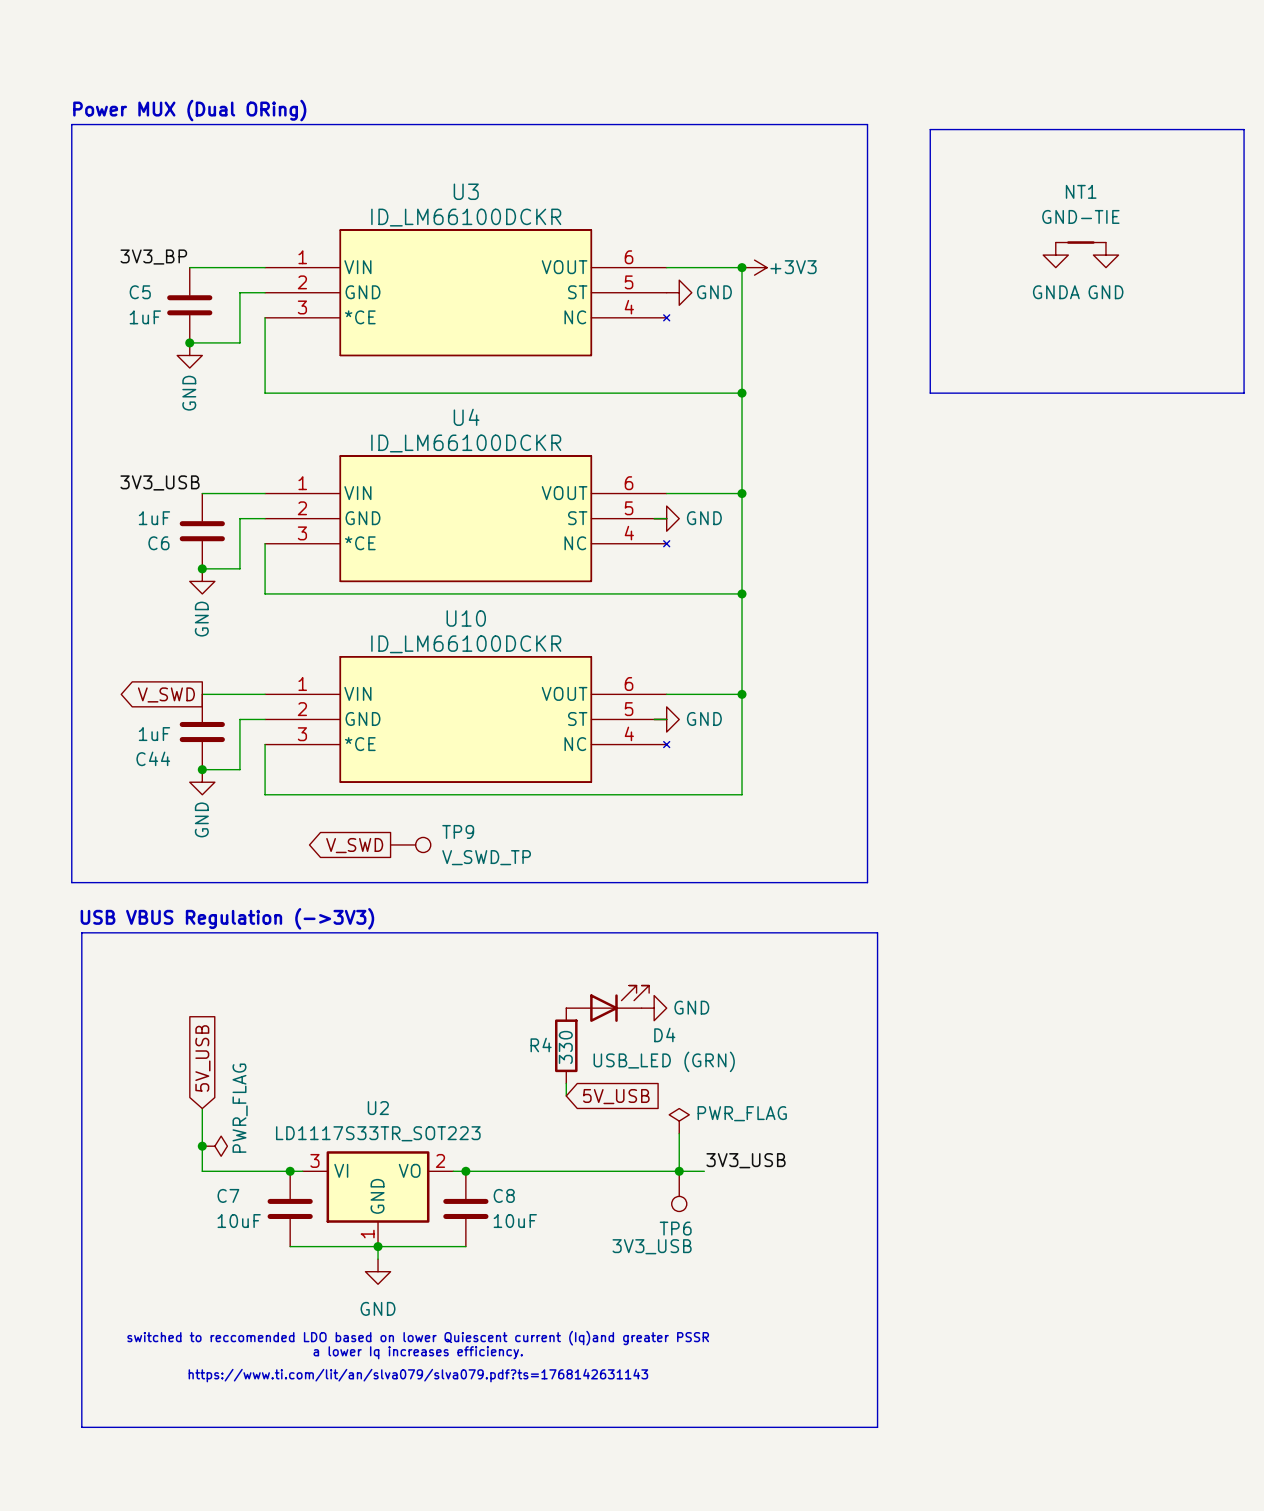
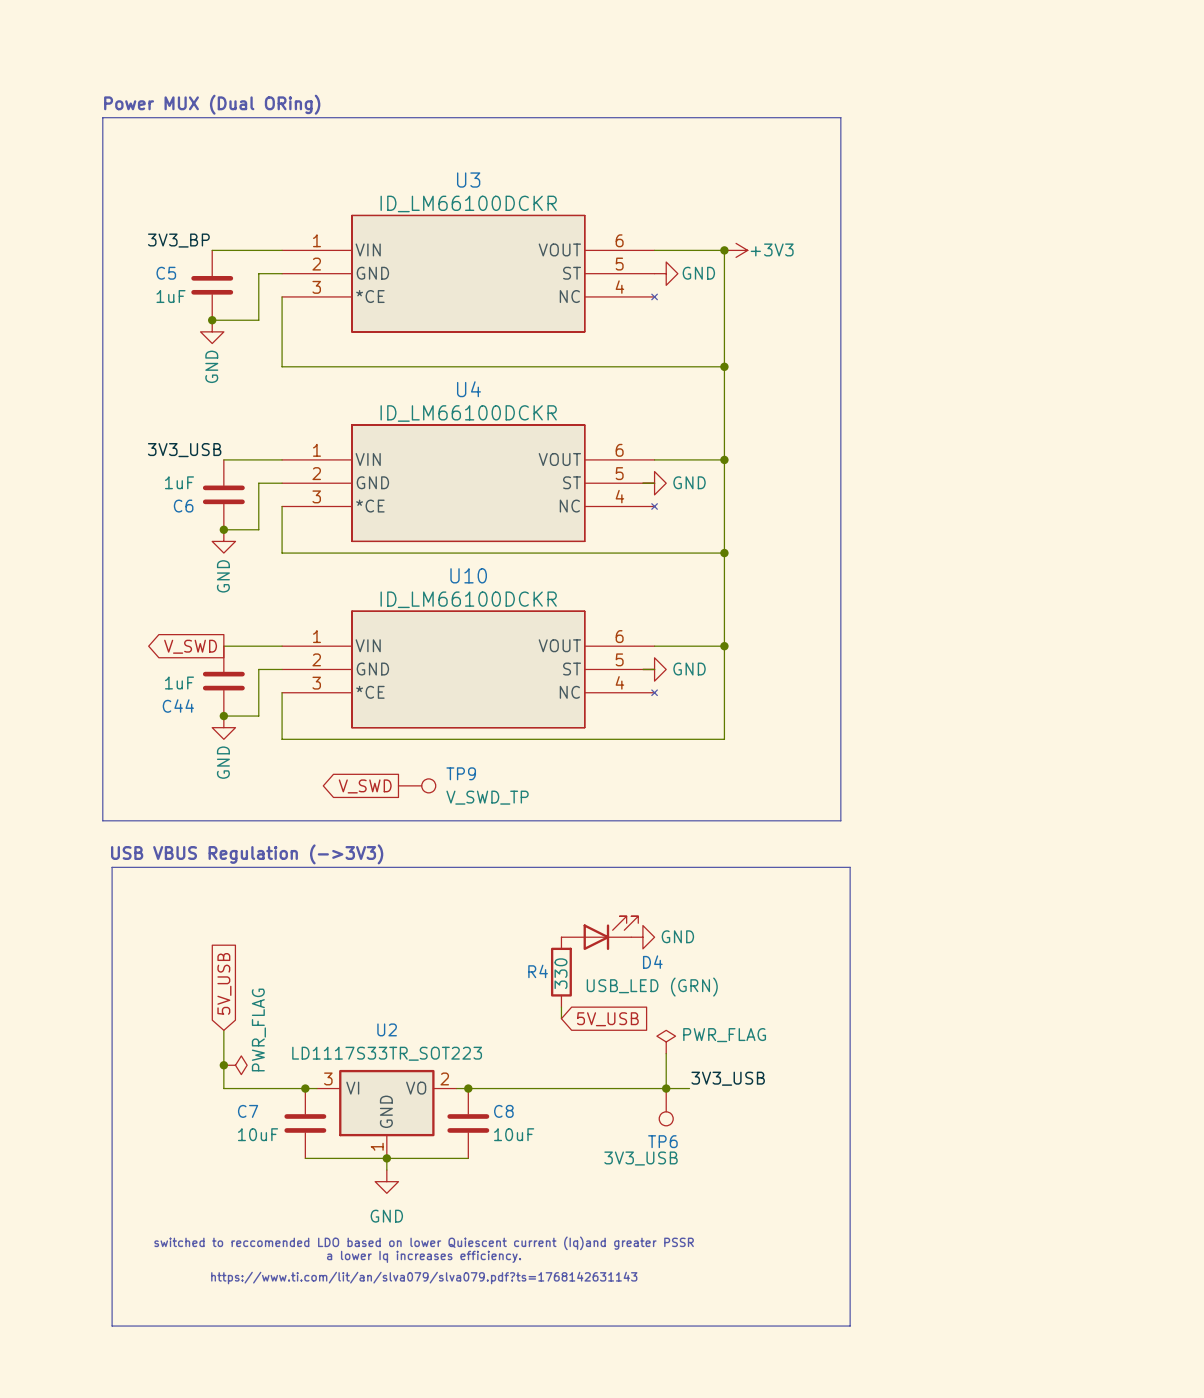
line: (930, 129) (1244, 129) (1244, 393) (930, 393) (930, 129) -> none
NT1: GND-TIE (1080, 242) -> none
power symbol: GNDA (1055, 255) -> none
power symbol: GND (1105, 255) -> none

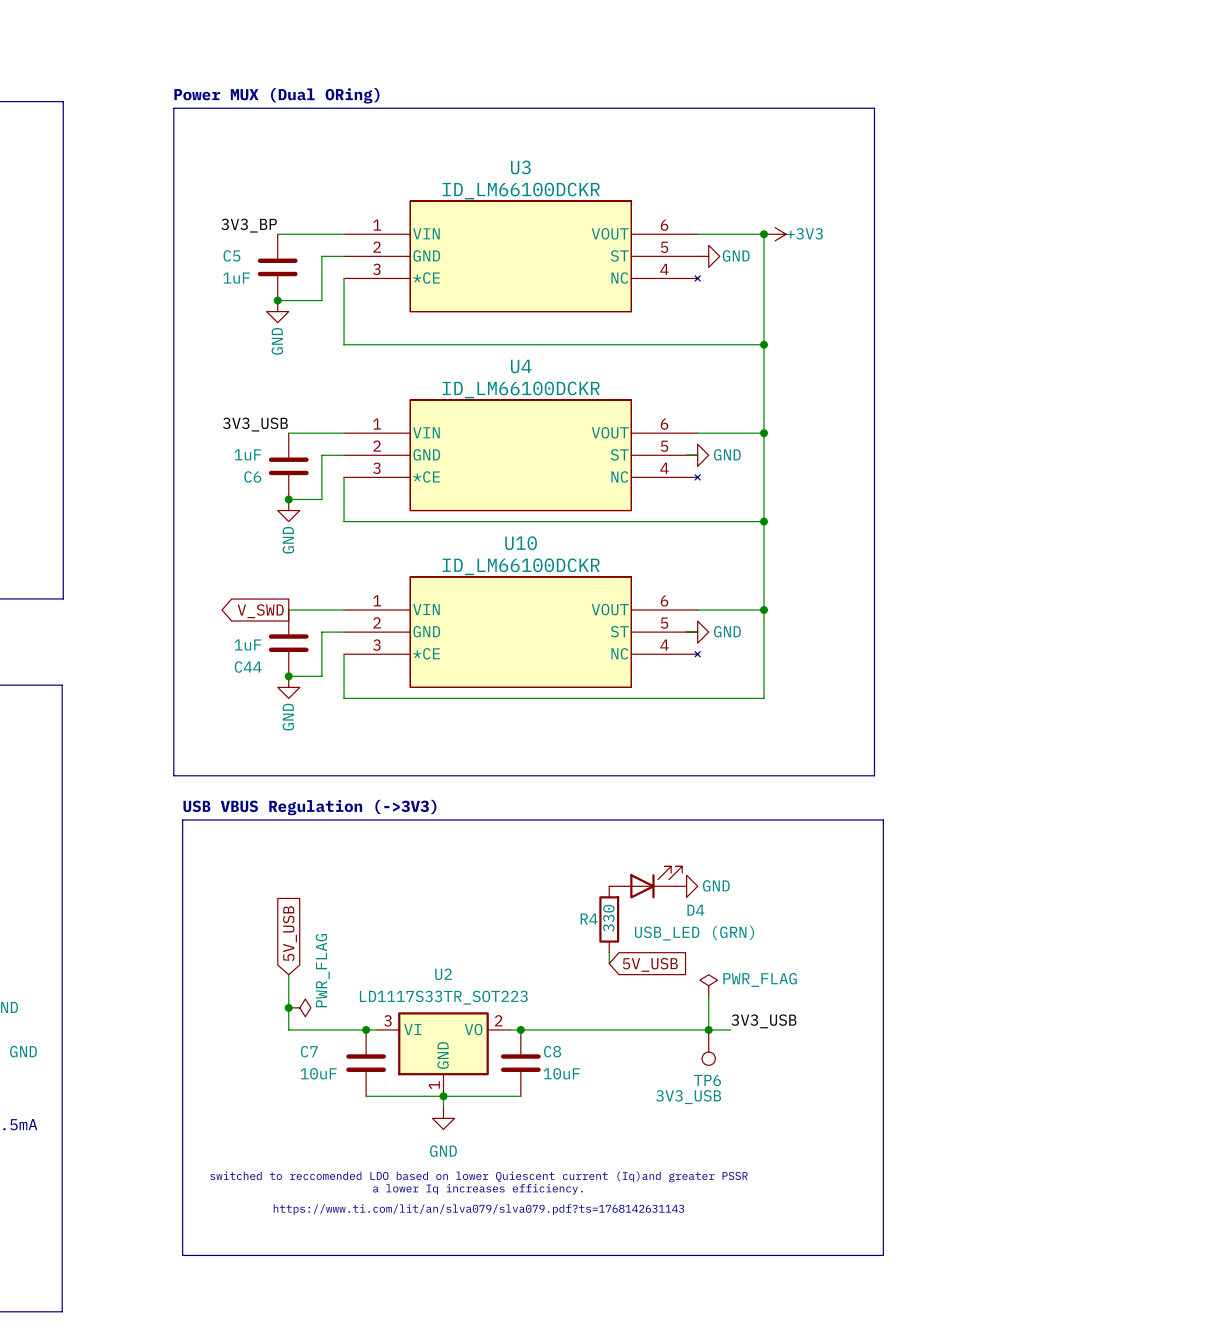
TP9: V_SWD_TP (417, 785) -> none
global label: V_SWD (365, 786) -> none

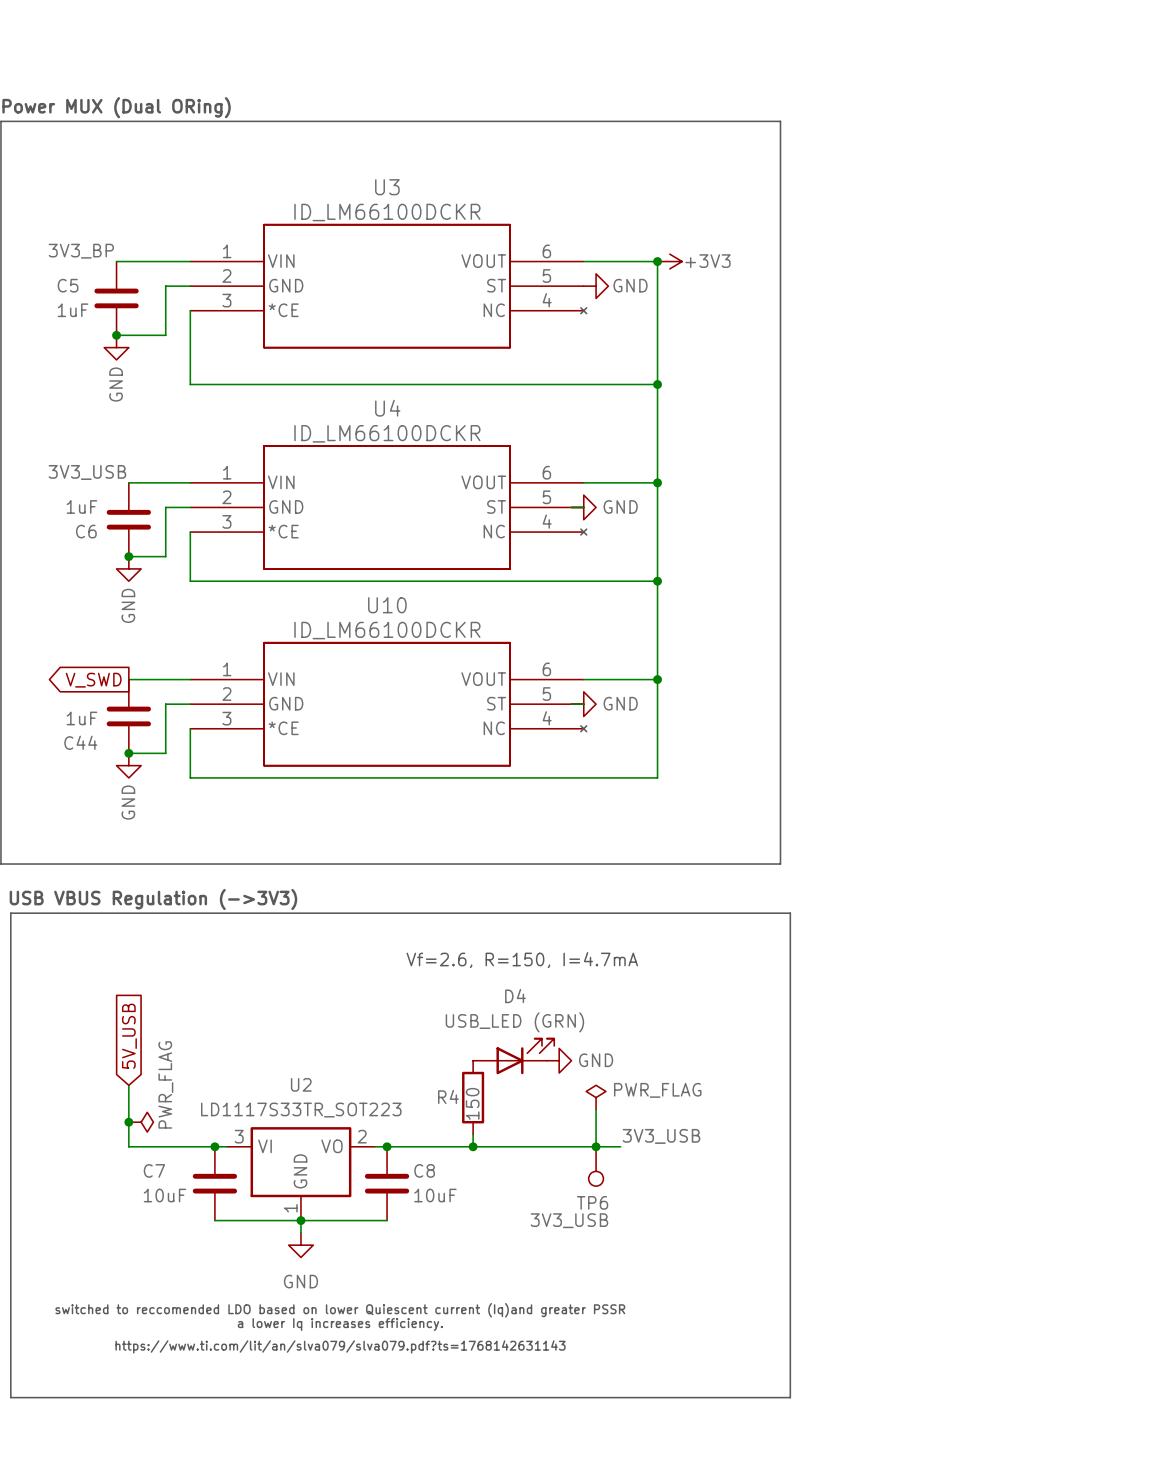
text: none -> Vf=2.6, R=150, I=4.7mA (522, 960)
D4 position: (645, 882) -> (513, 1056)
power symbol position: GND (686, 886) -> GND (559, 1060)
D4 name position: D4 (695, 910) -> D4 (515, 996)
R4 value: 330 (608, 918) -> 150 (472, 1103)
R4 position: (609, 919) -> (473, 1097)
D4 value position: USB_LED (GRN) (694, 933) -> USB_LED (GRN) (514, 1022)
wire: (609, 952) (609, 963) -> (473, 1134) (473, 1146)
global label: 5V_USB (650, 964) -> none
junction: none -> (473, 1146)

